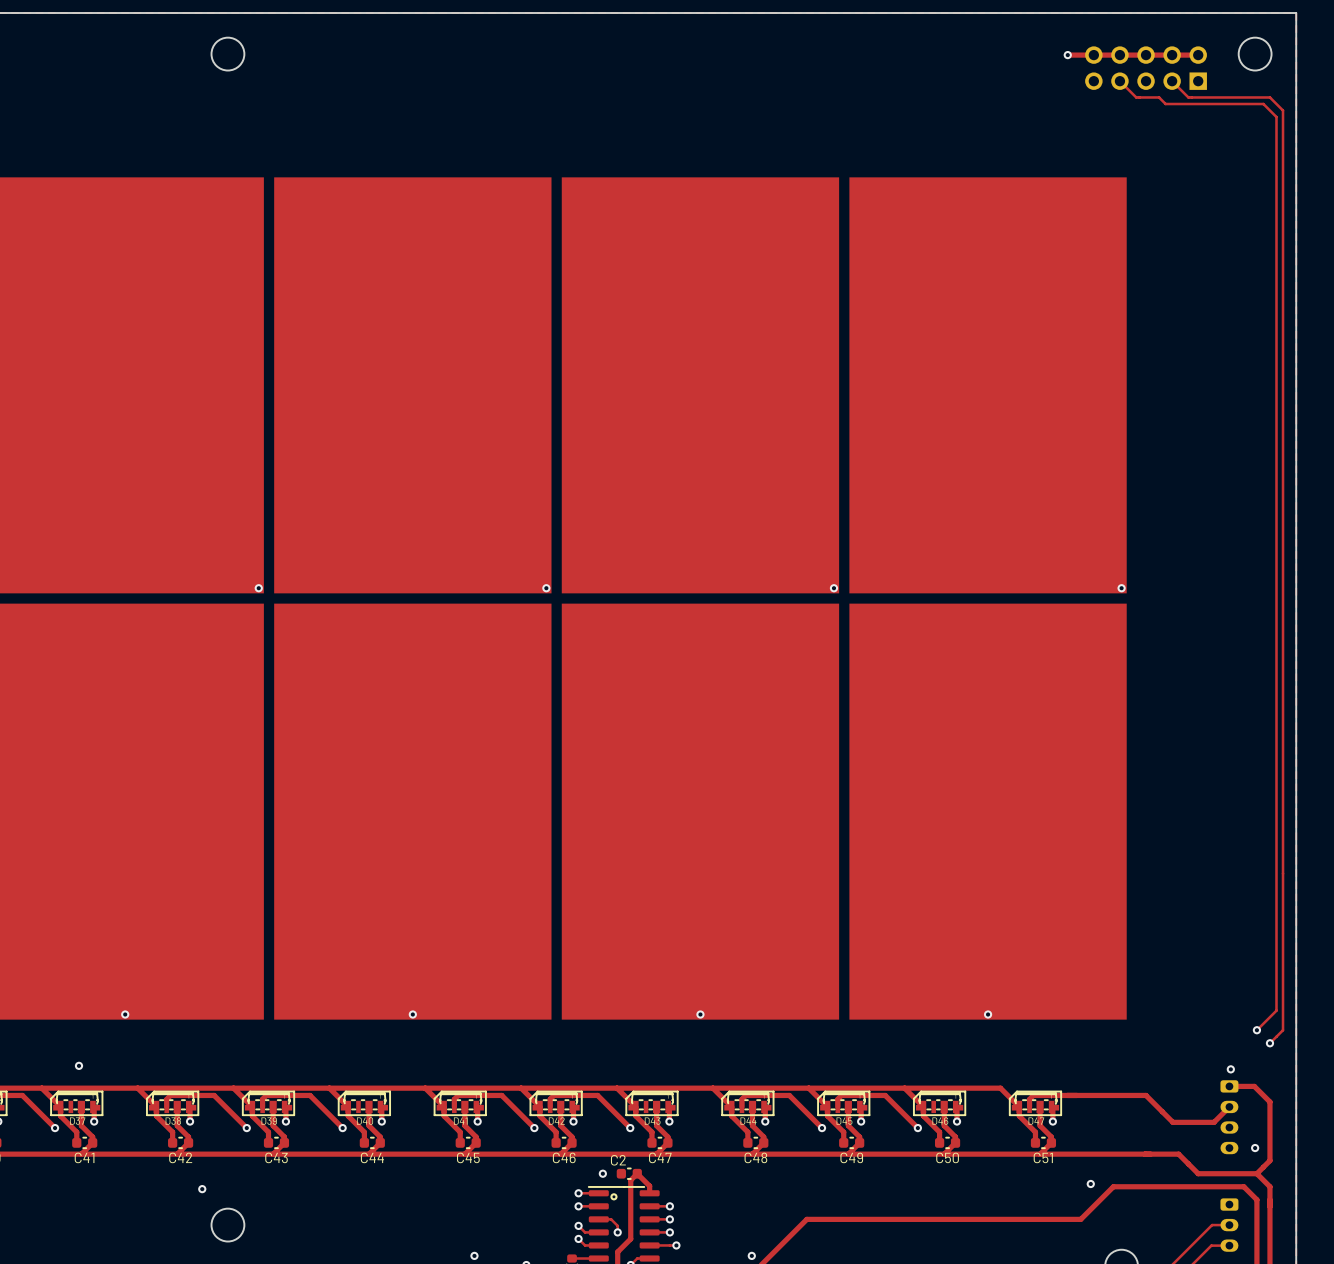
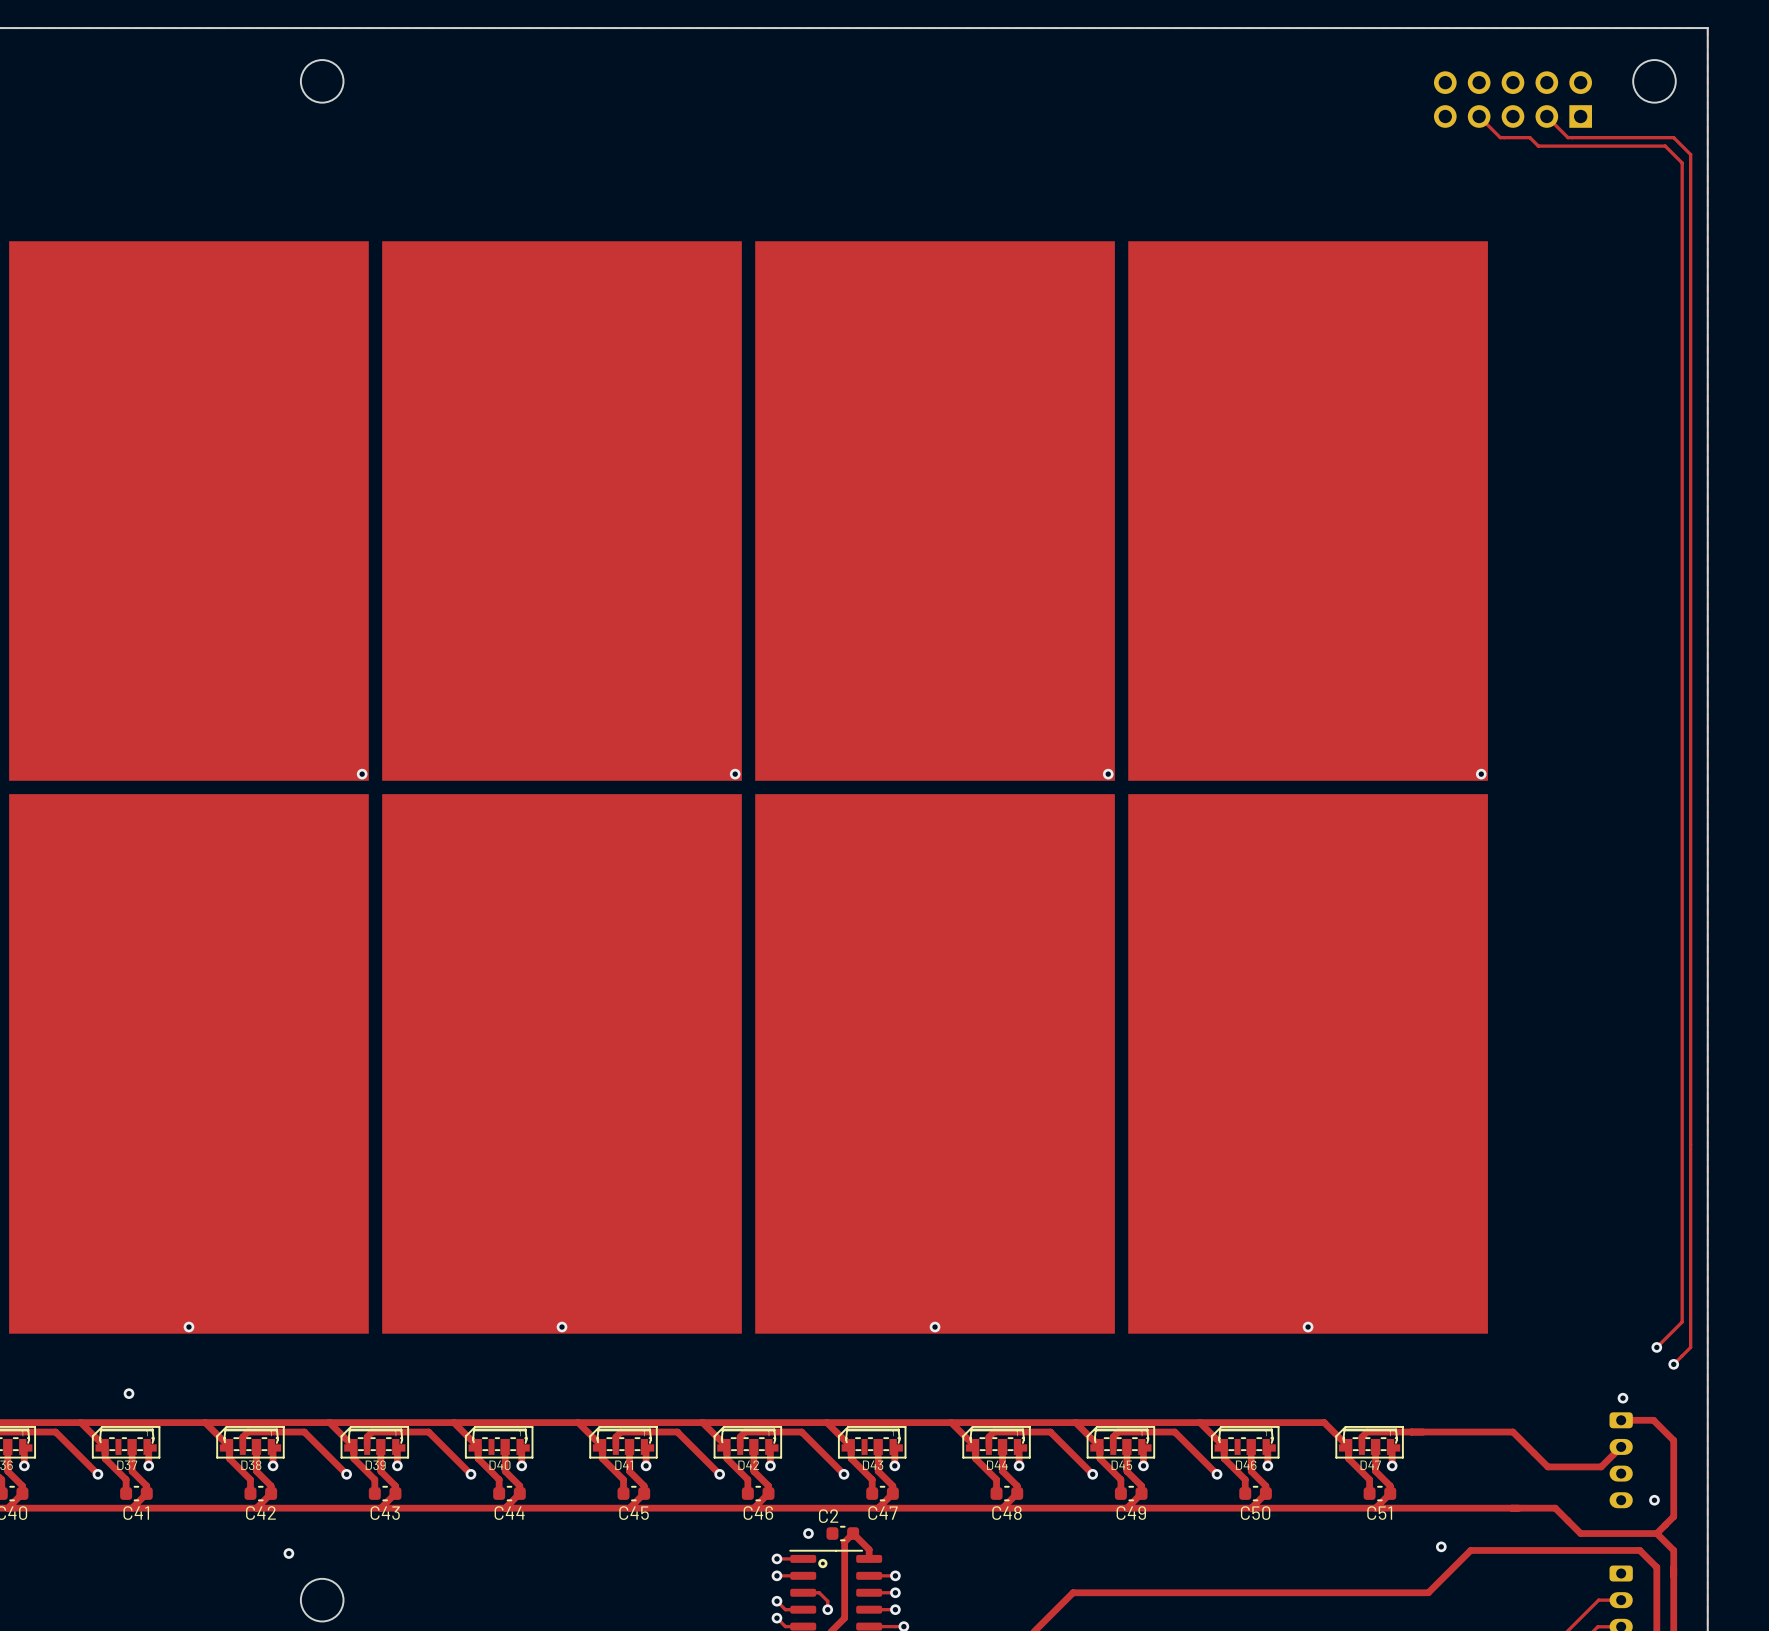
track: (1067, 55) (1198, 55) -> none
via: (1067, 55) -> none

